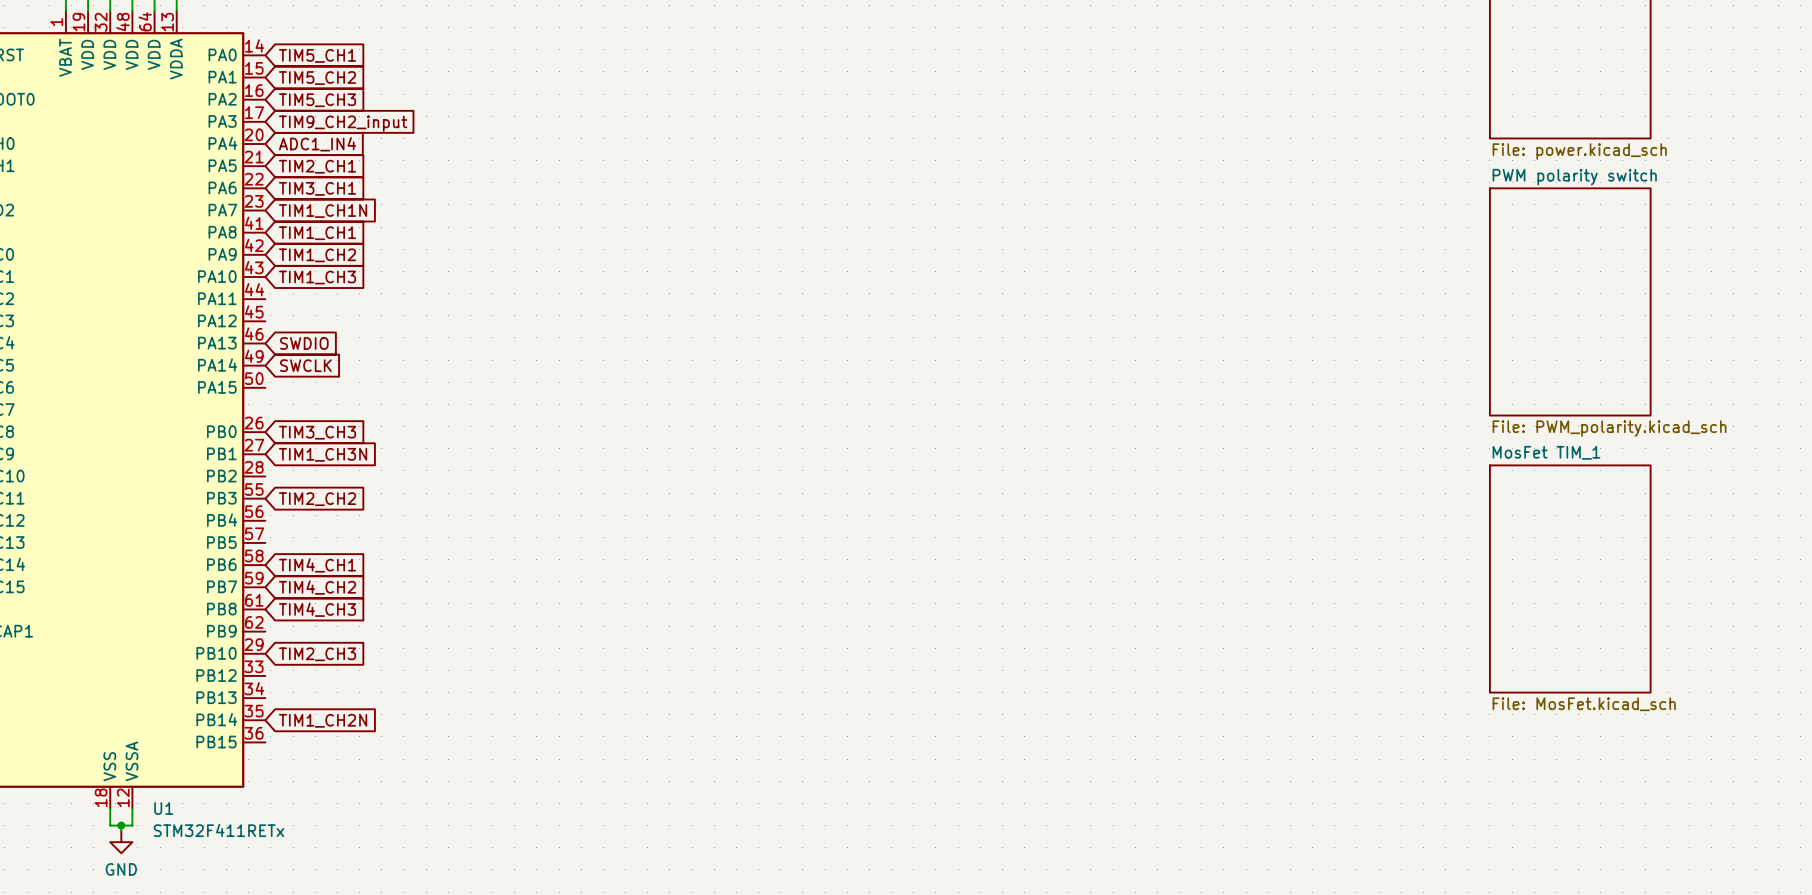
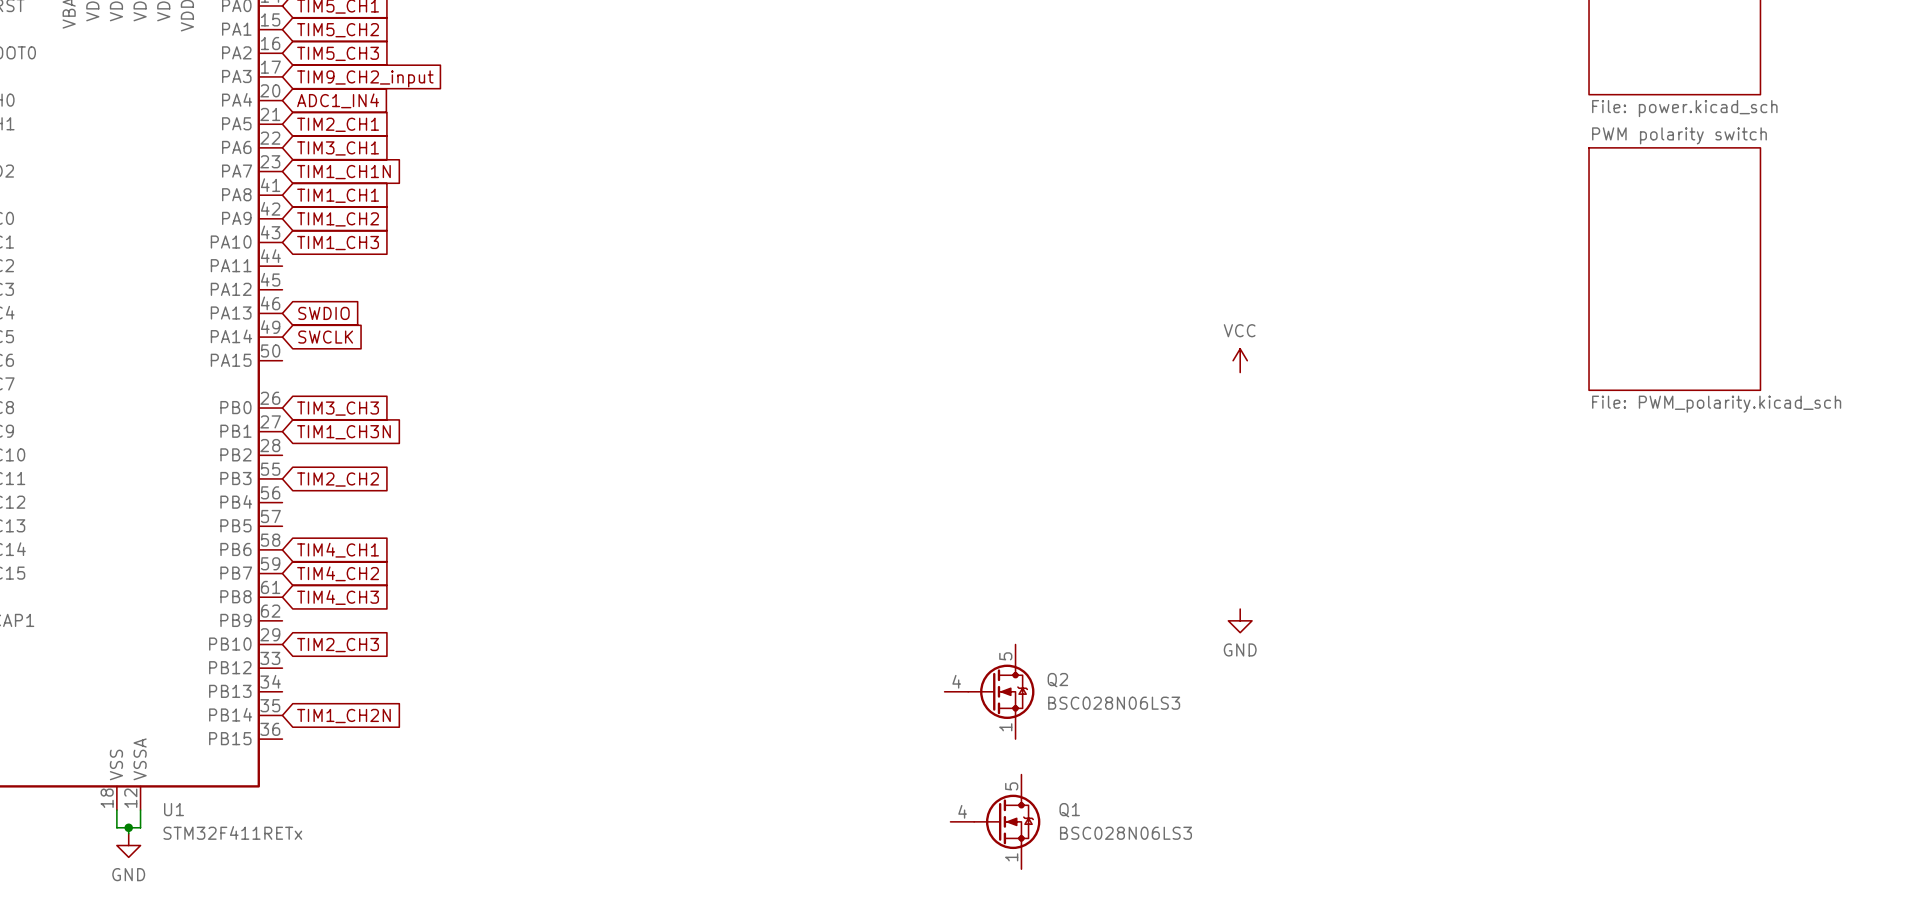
power symbol: none -> VCC (1240, 360)
sheet MosFet TIM_1: File: MosFet.kicad_sch (1570, 578) -> none
power symbol: none -> GND (1240, 620)
Q2: none -> BSC028N06LS3 (989, 691)
Q1: none -> BSC028N06LS3 (995, 821)

